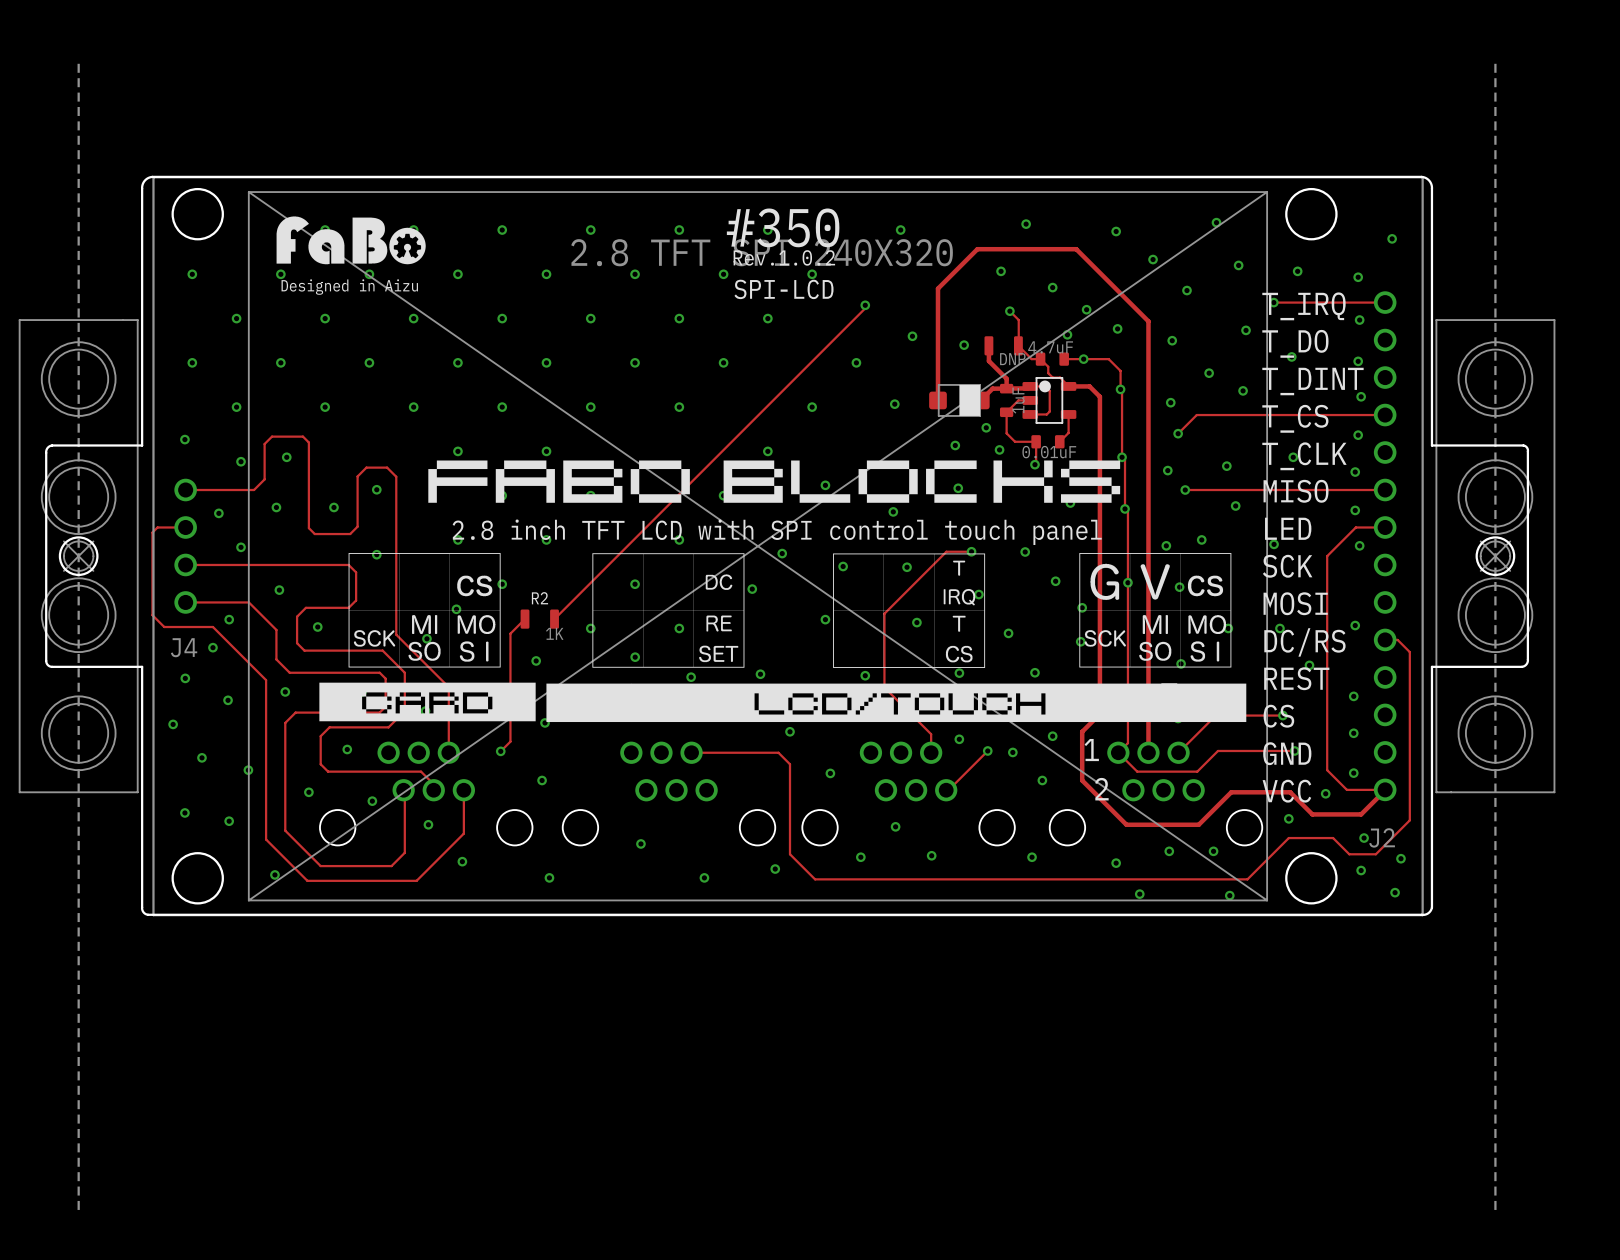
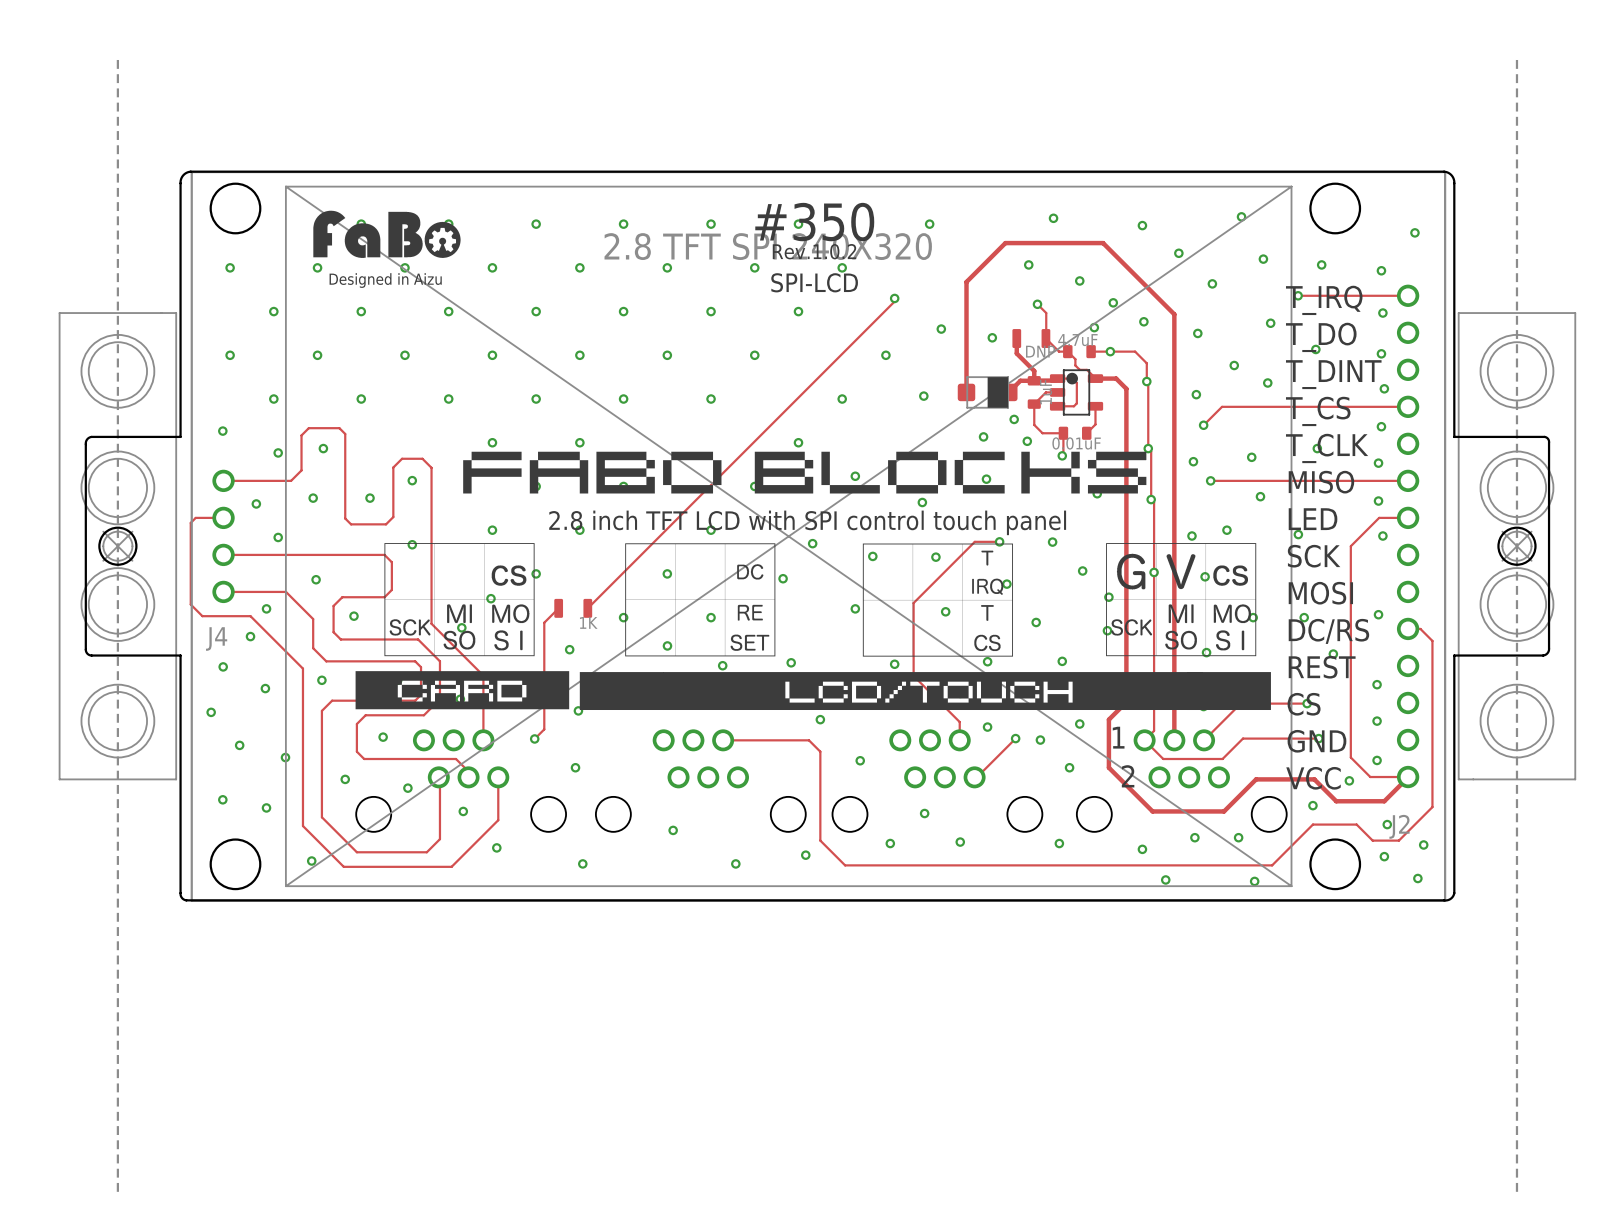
R2 name: R2 (539, 598) -> none

